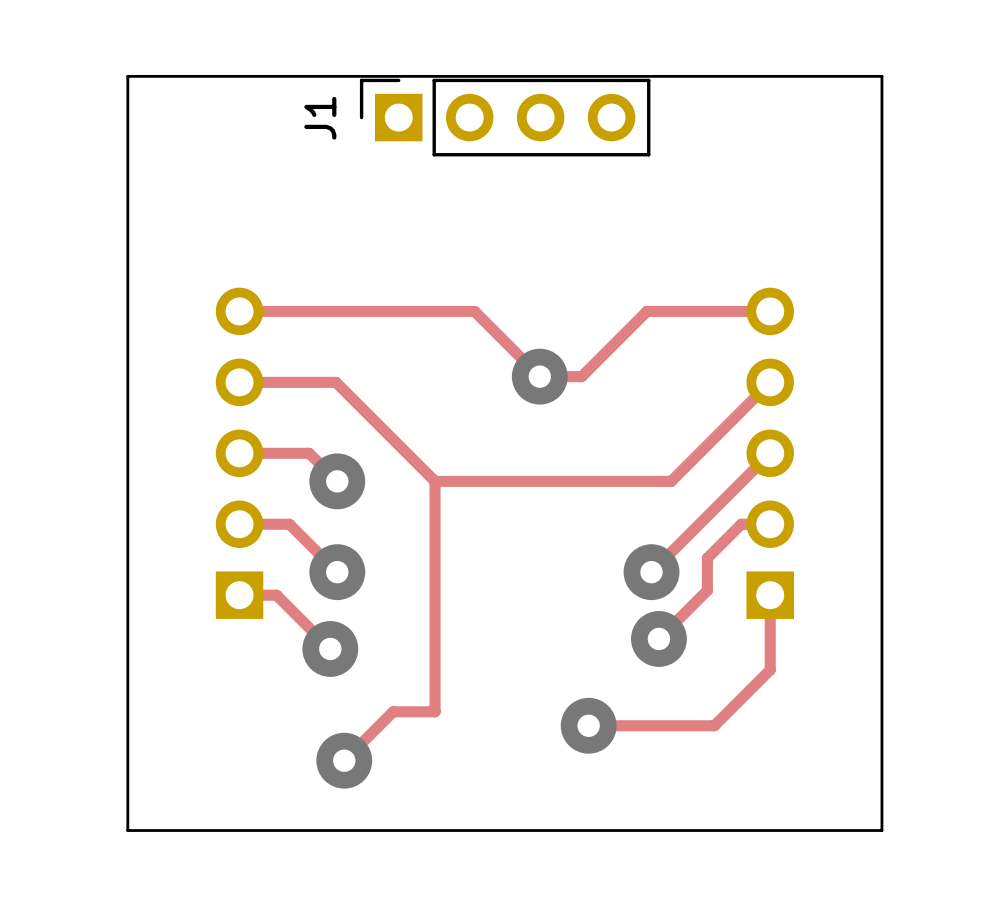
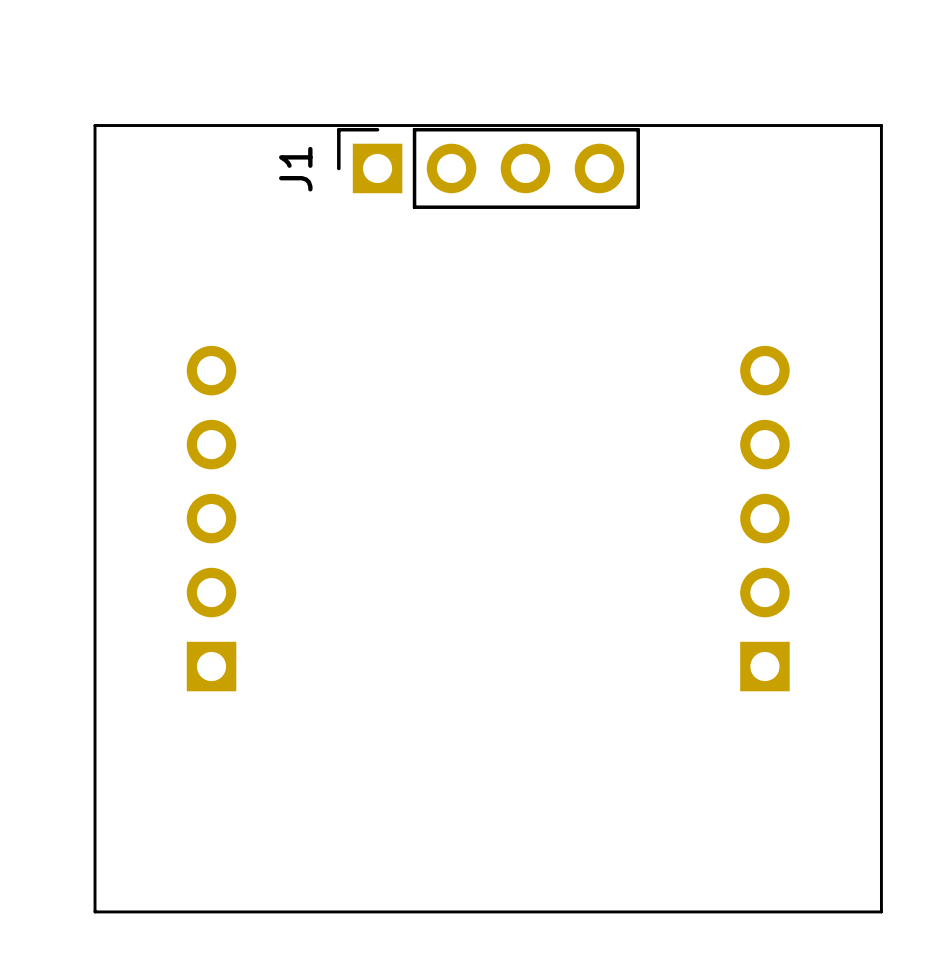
track: (239, 311) (474, 311) (539, 376) (581, 376) (646, 311) (770, 311) -> none
via: (539, 376) -> none
track: (239, 382) (336, 382) (435, 481) -> none
track: (770, 382) (671, 481) (435, 481) -> none
track: (239, 453) (309, 453) (337, 481) -> none
track: (770, 453) (651, 572) -> none
via: (337, 481) -> none
track: (435, 481) (435, 711) (393, 711) (344, 760) -> none
track: (239, 524) (289, 524) (337, 572) -> none
track: (770, 524) (741, 524) (707, 558) (707, 590) (658, 638) -> none
via: (337, 572) -> none
via: (651, 572) -> none
track: (239, 595) (276, 595) (330, 648) -> none
track: (770, 595) (770, 669) (714, 725) (588, 725) -> none
via: (658, 638) -> none
via: (330, 648) -> none
via: (588, 725) -> none
via: (344, 760) -> none

